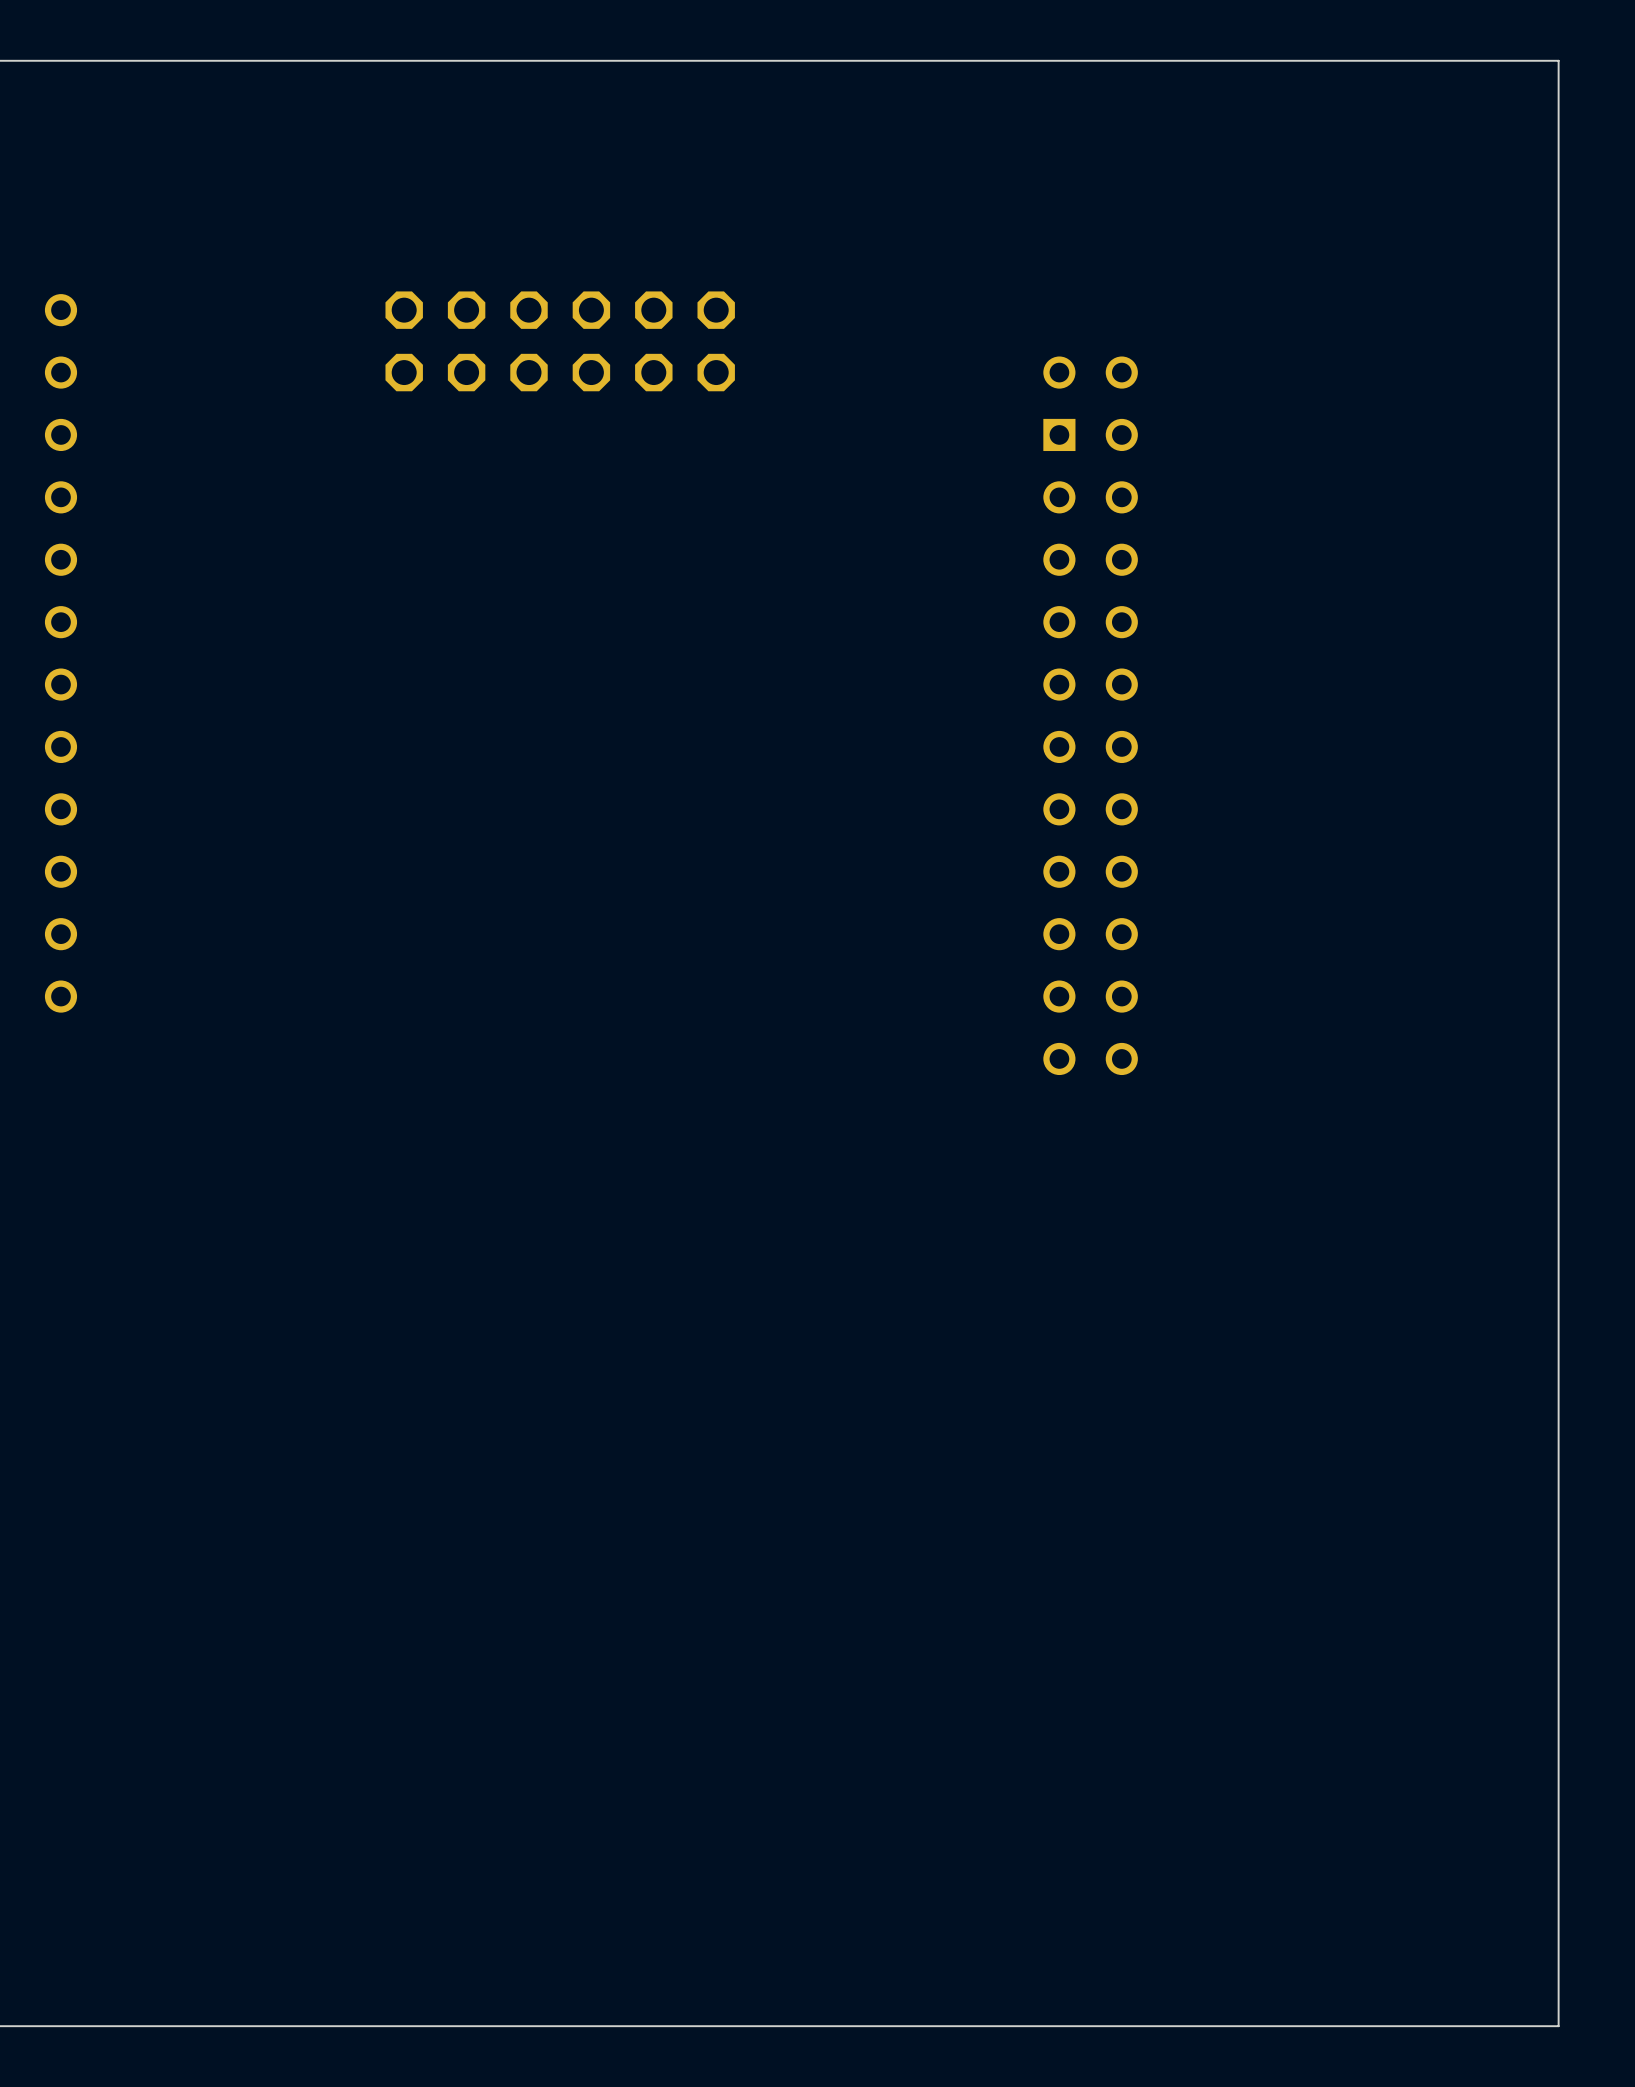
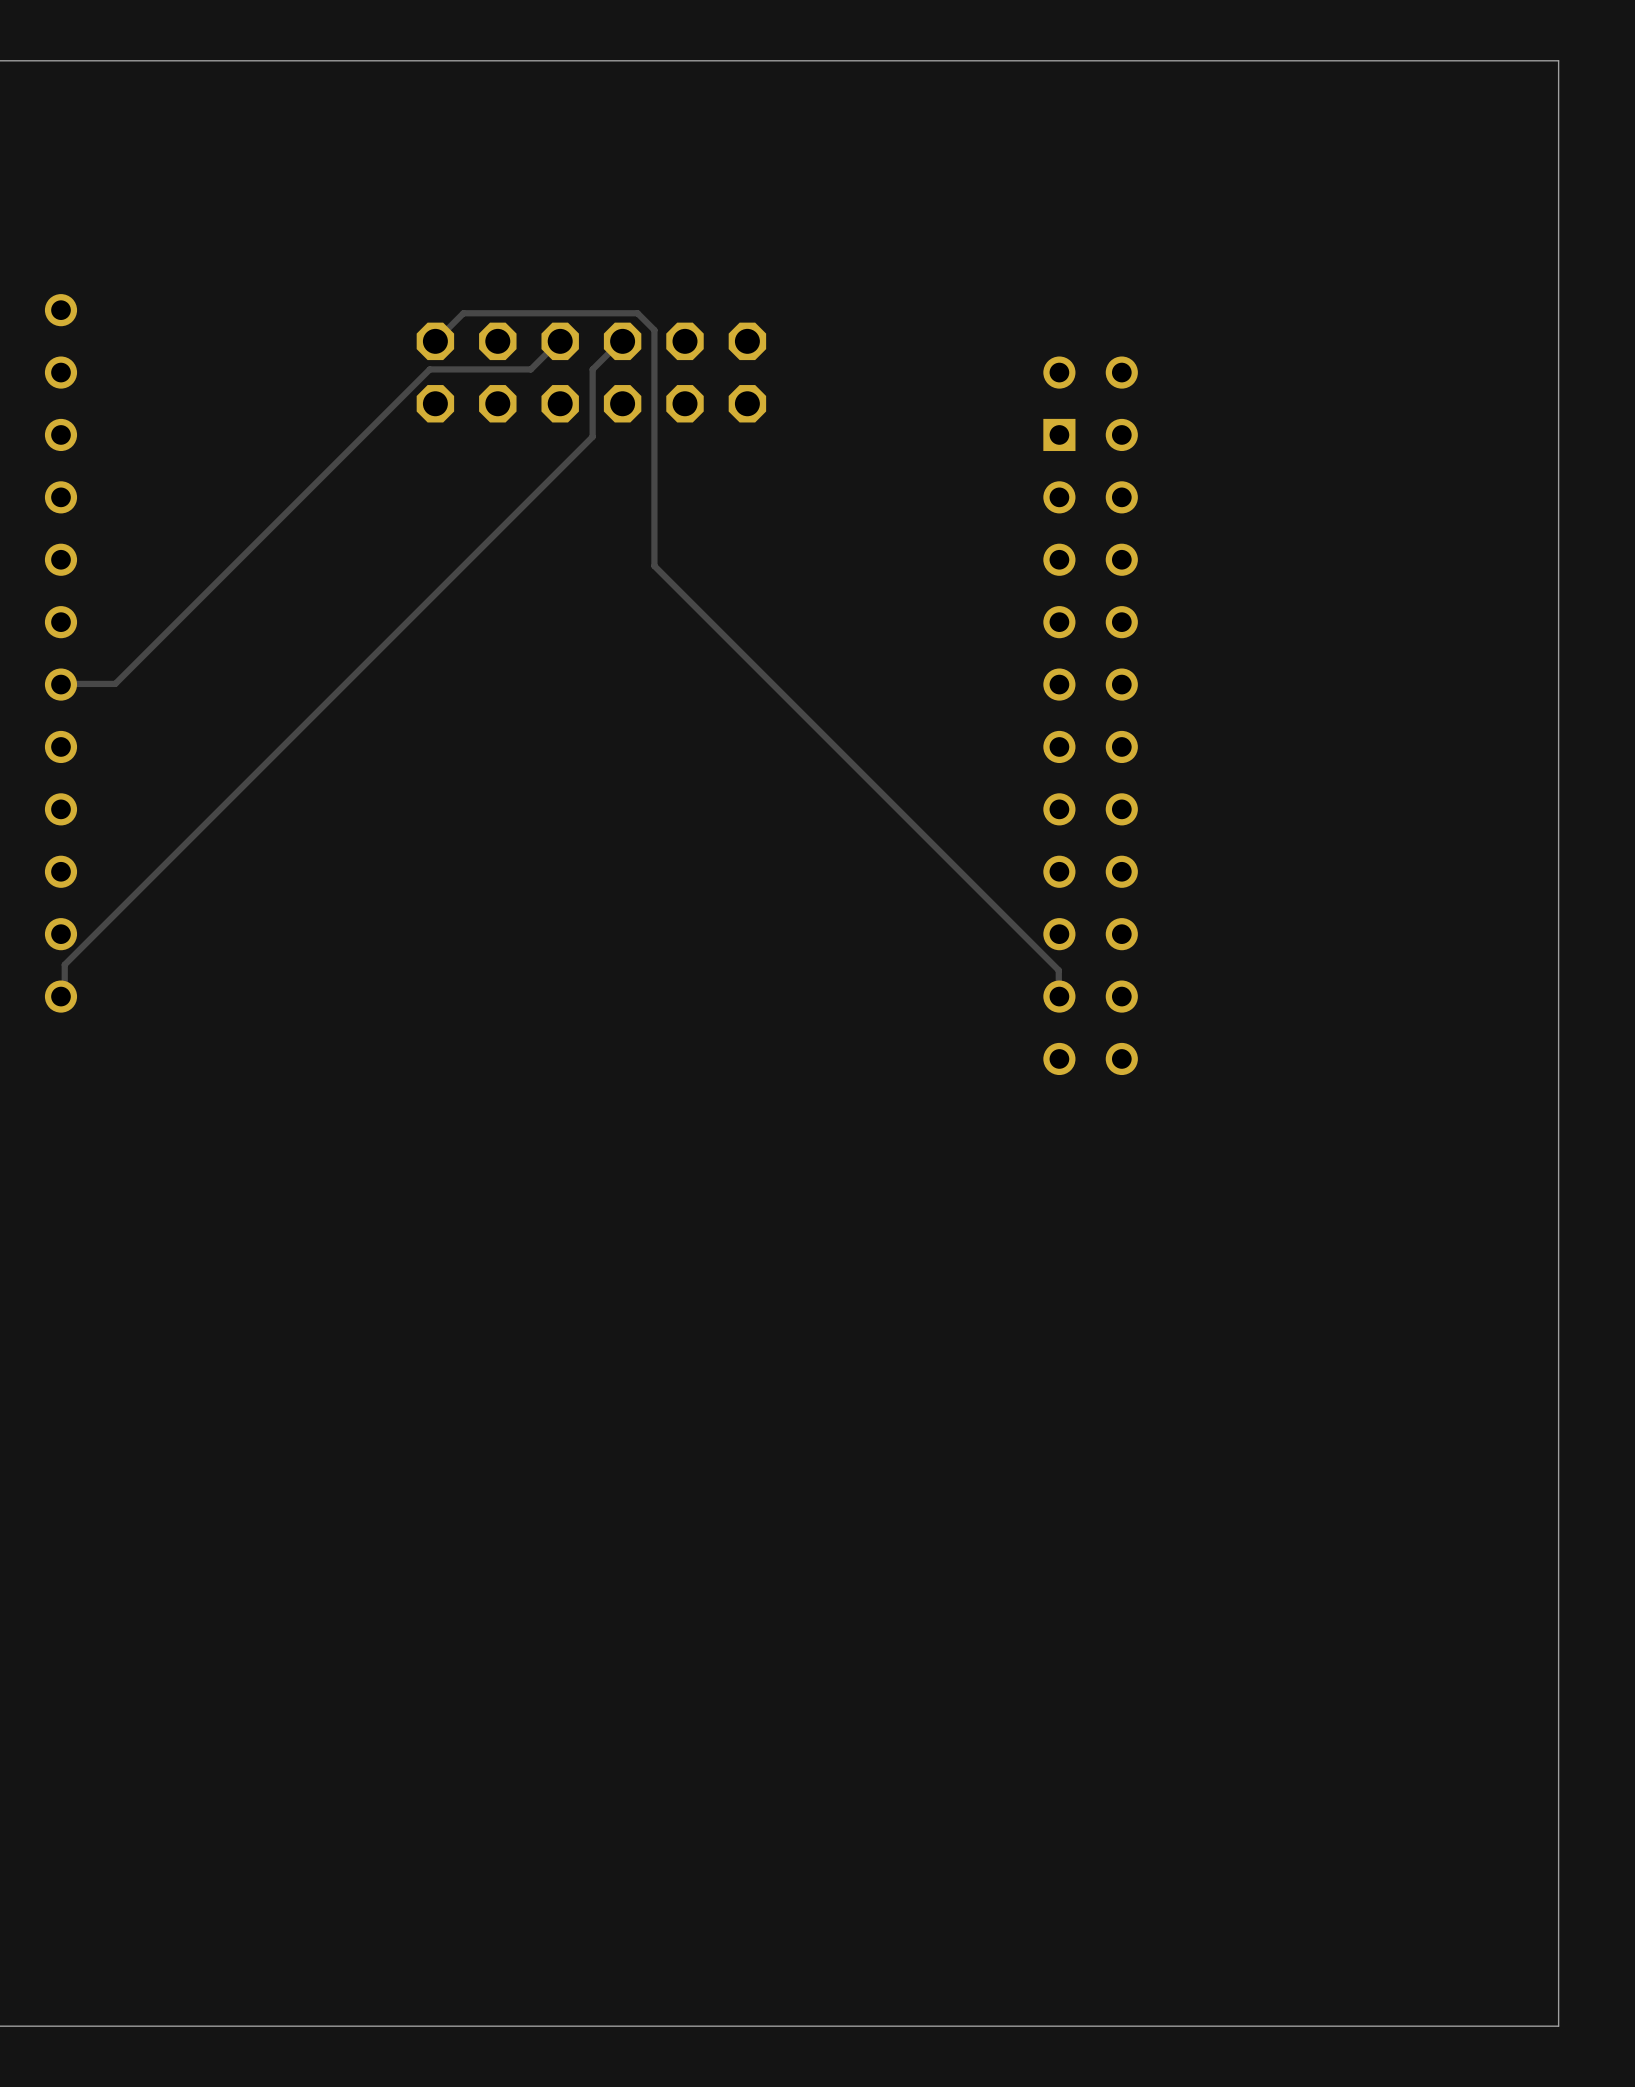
track: none -> (435, 341) (463, 313) (637, 313) (654, 330) (654, 565) (1058, 970) (1059, 996)
track: none -> (560, 341) (530, 369) (429, 369) (115, 683) (60, 684)
part position: (560, 341) -> (591, 372)
track: none -> (622, 341) (592, 369) (592, 436) (64, 964) (64, 992) (60, 996)

